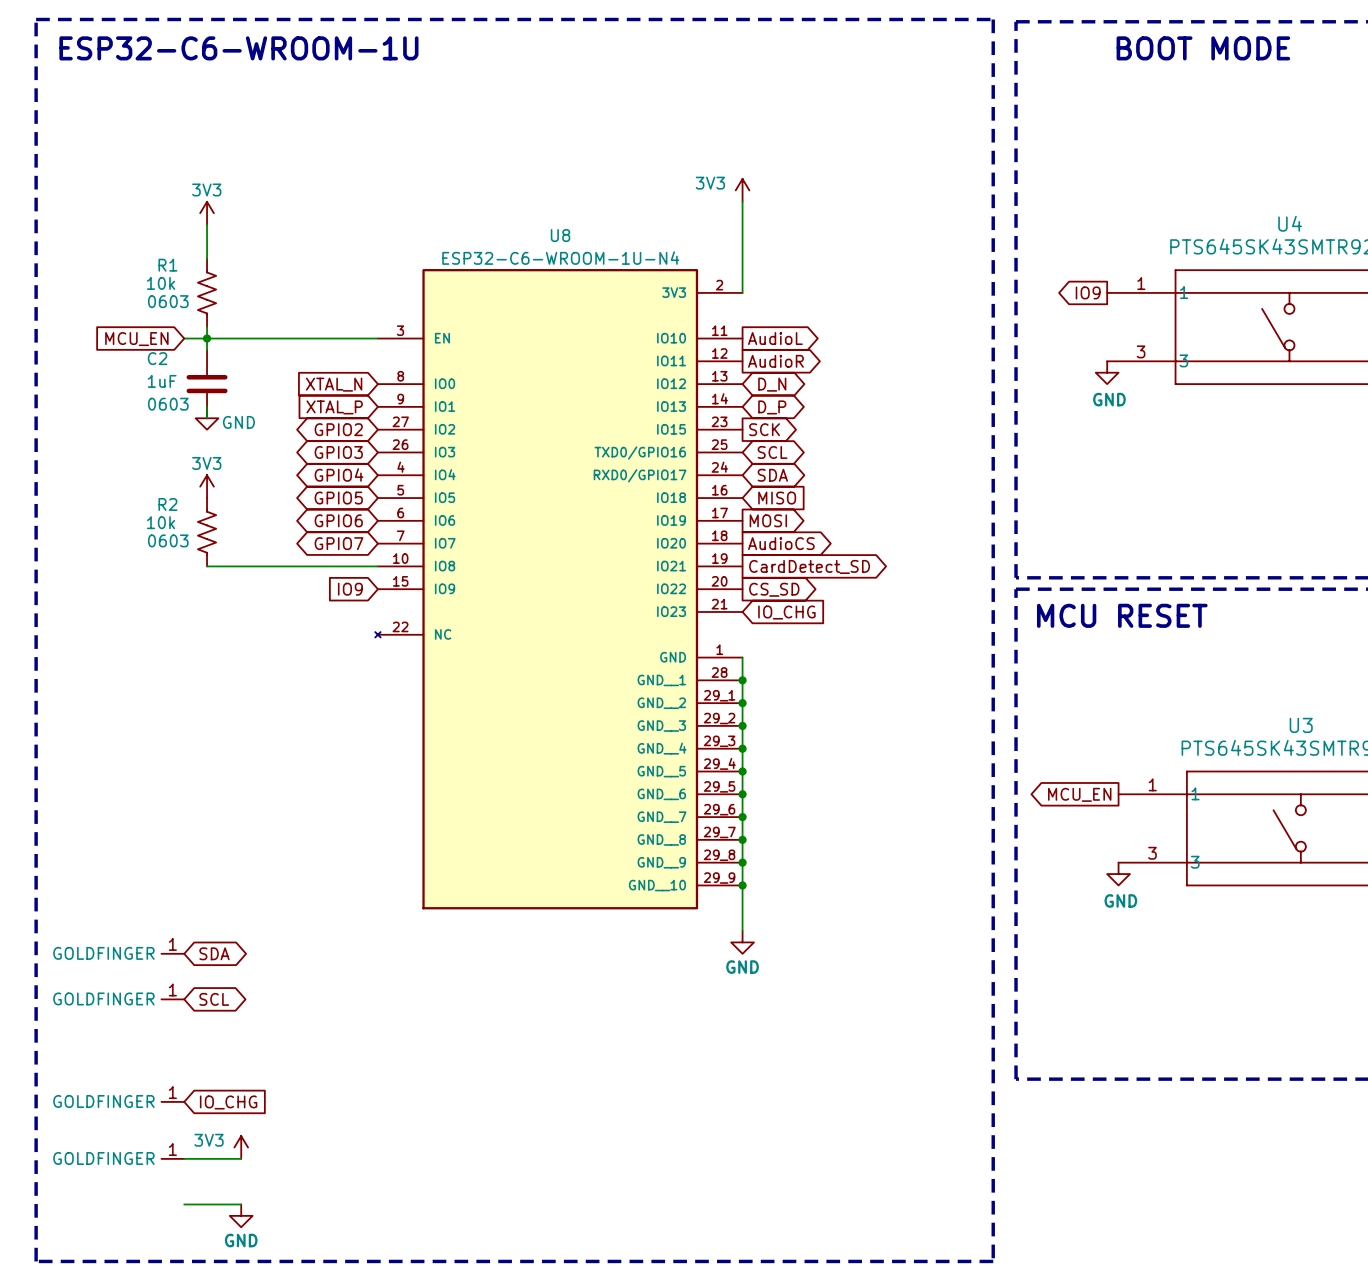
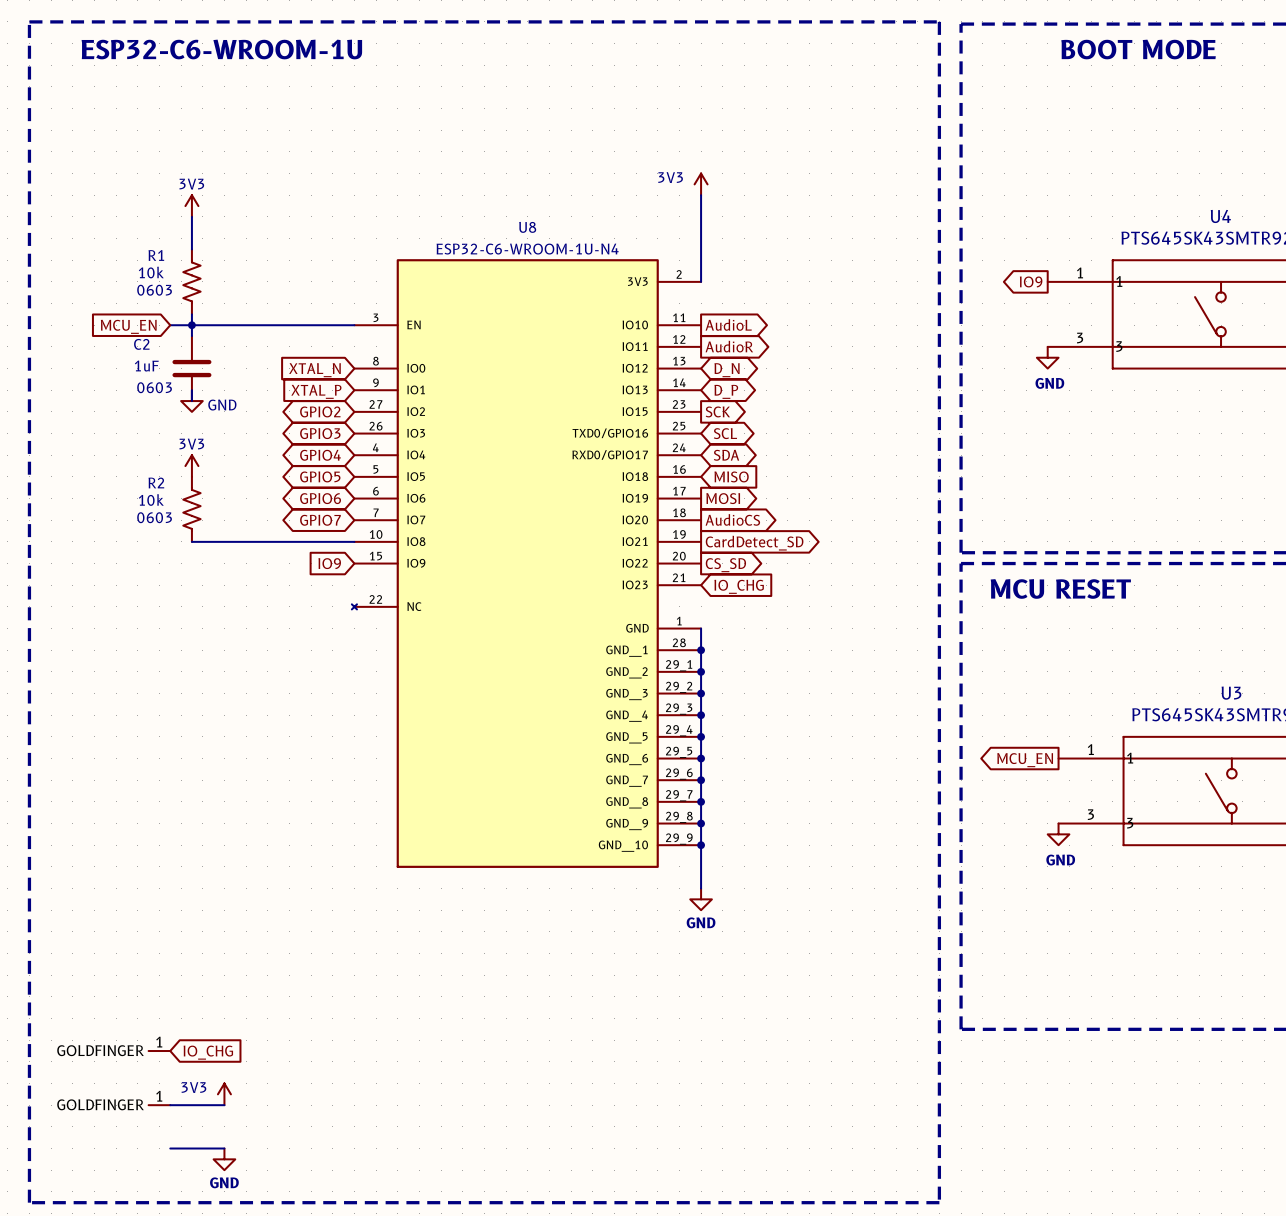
part: (172, 953) -> none
global label: SDA (214, 953) -> none
part: (172, 999) -> none
global label: SCL (214, 999) -> none

